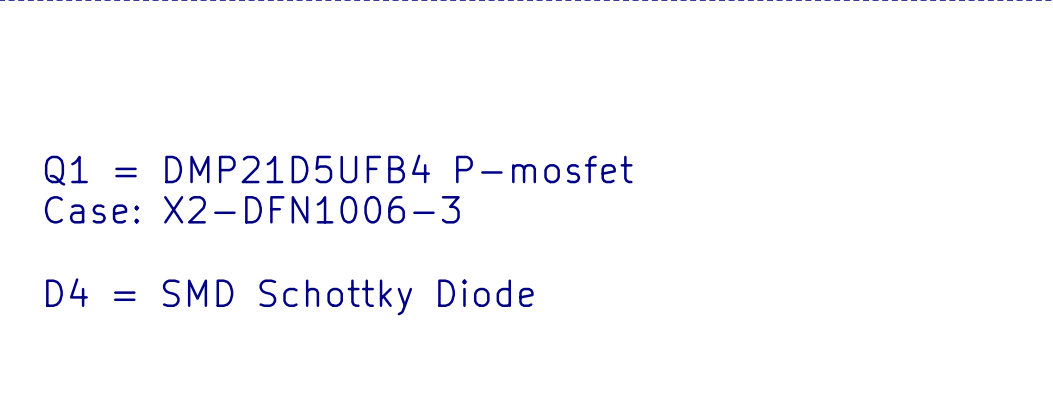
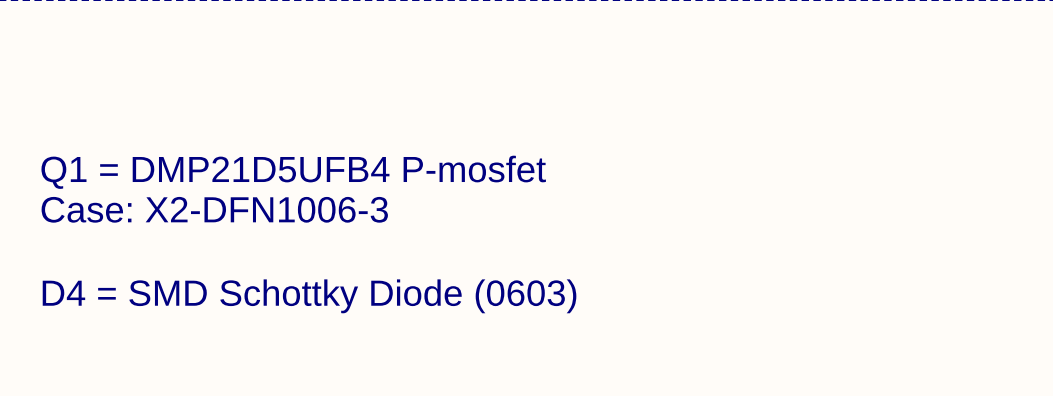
text: D4 = SMD Schottky Diode (289, 296) -> D4 = SMD Schottky Diode (0603) (309, 296)

